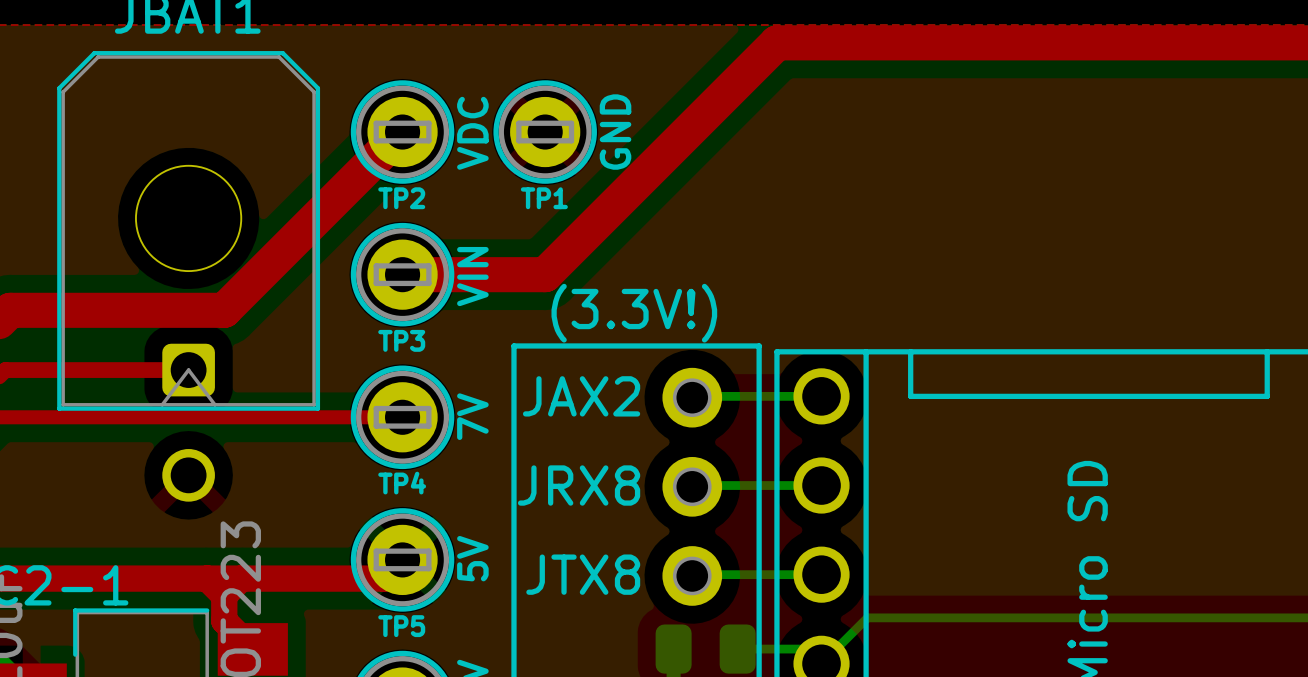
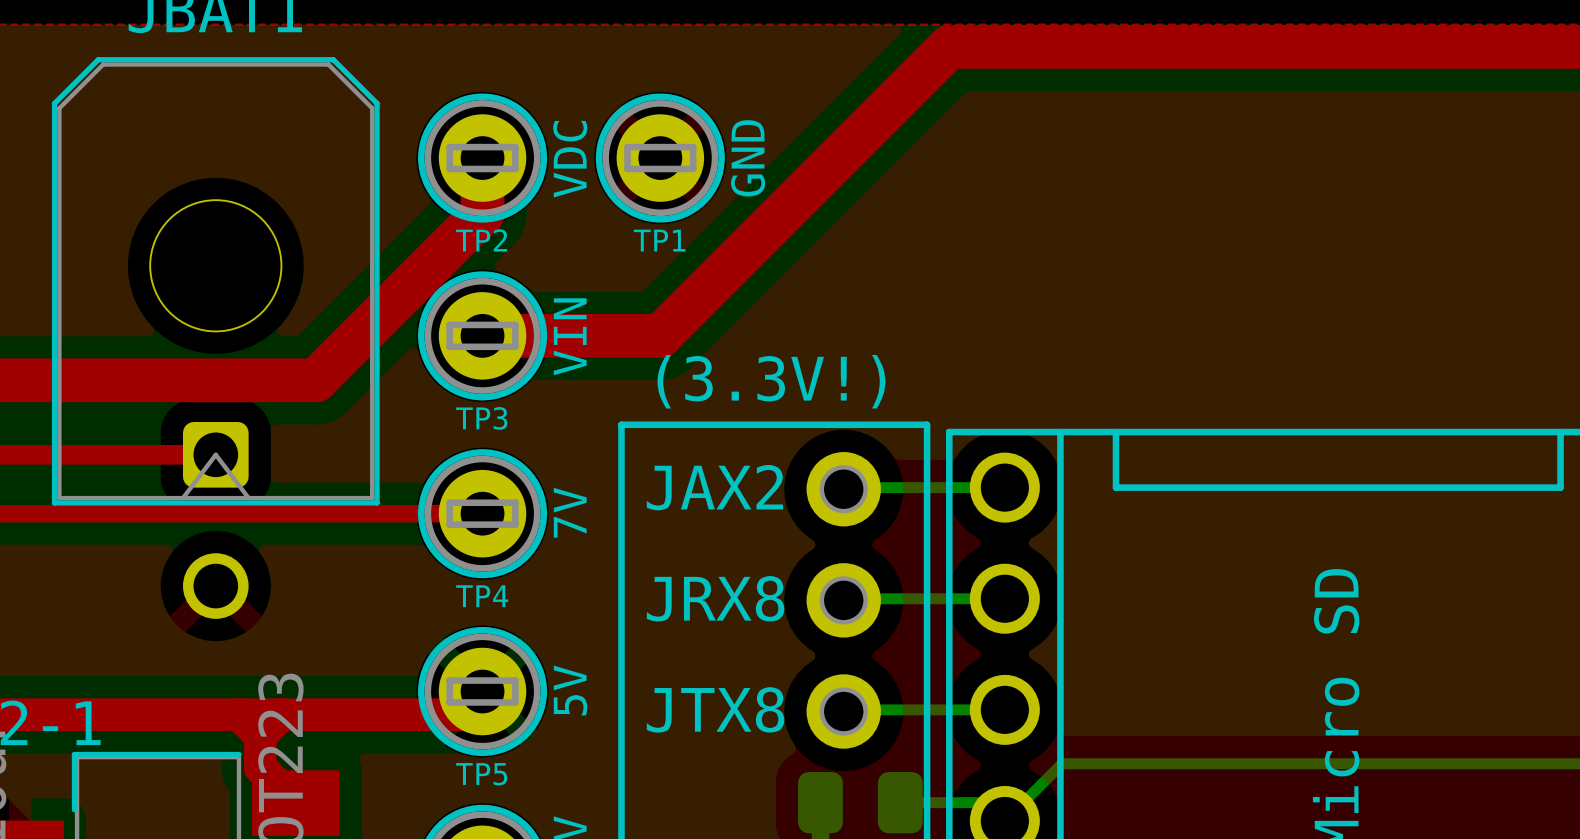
top track: (402, 132) (224, 310) -> (482, 158) (482, 213) (315, 380) (260, 380)

